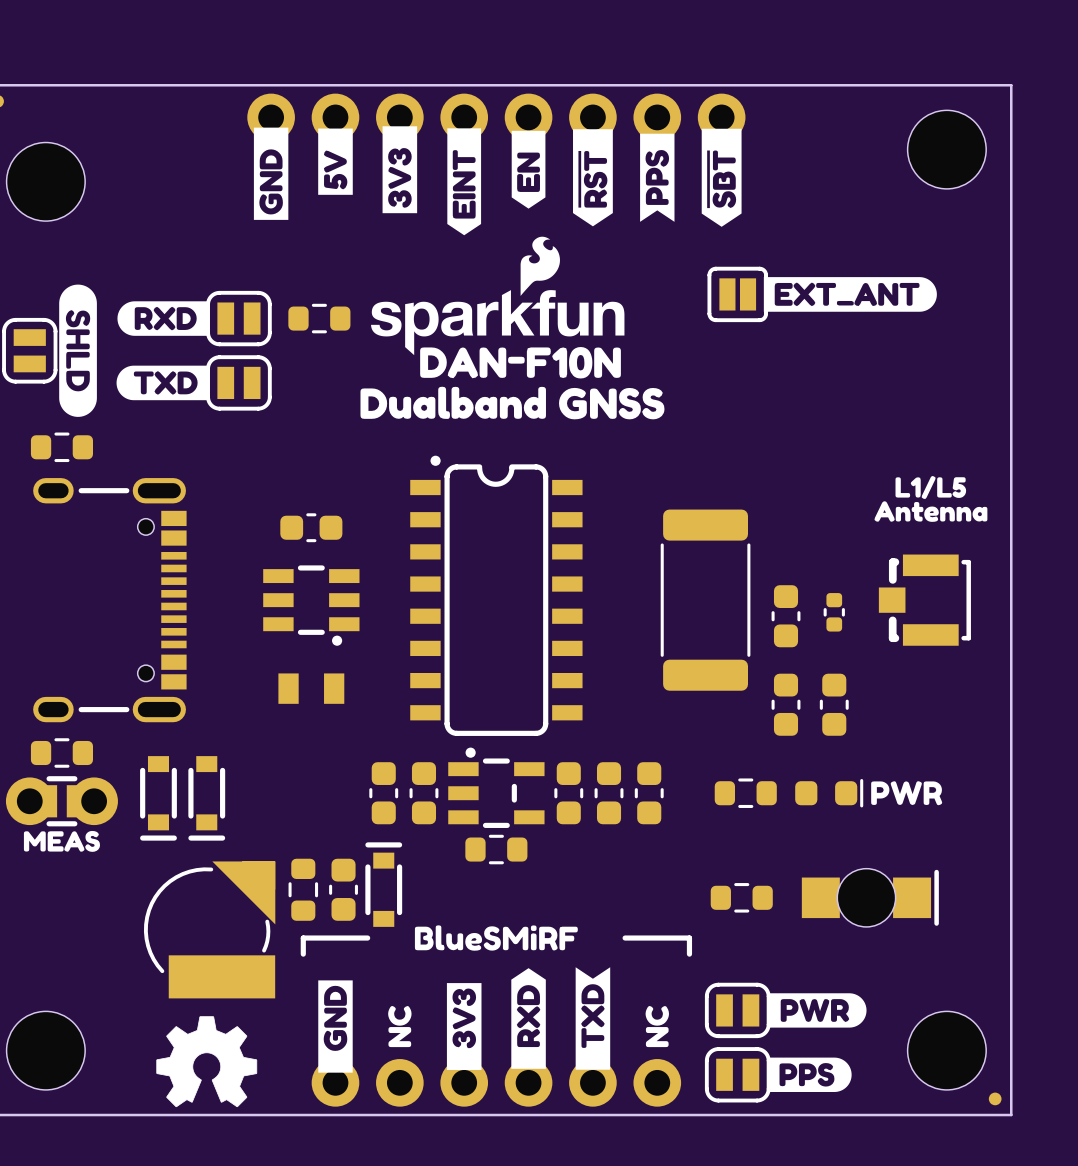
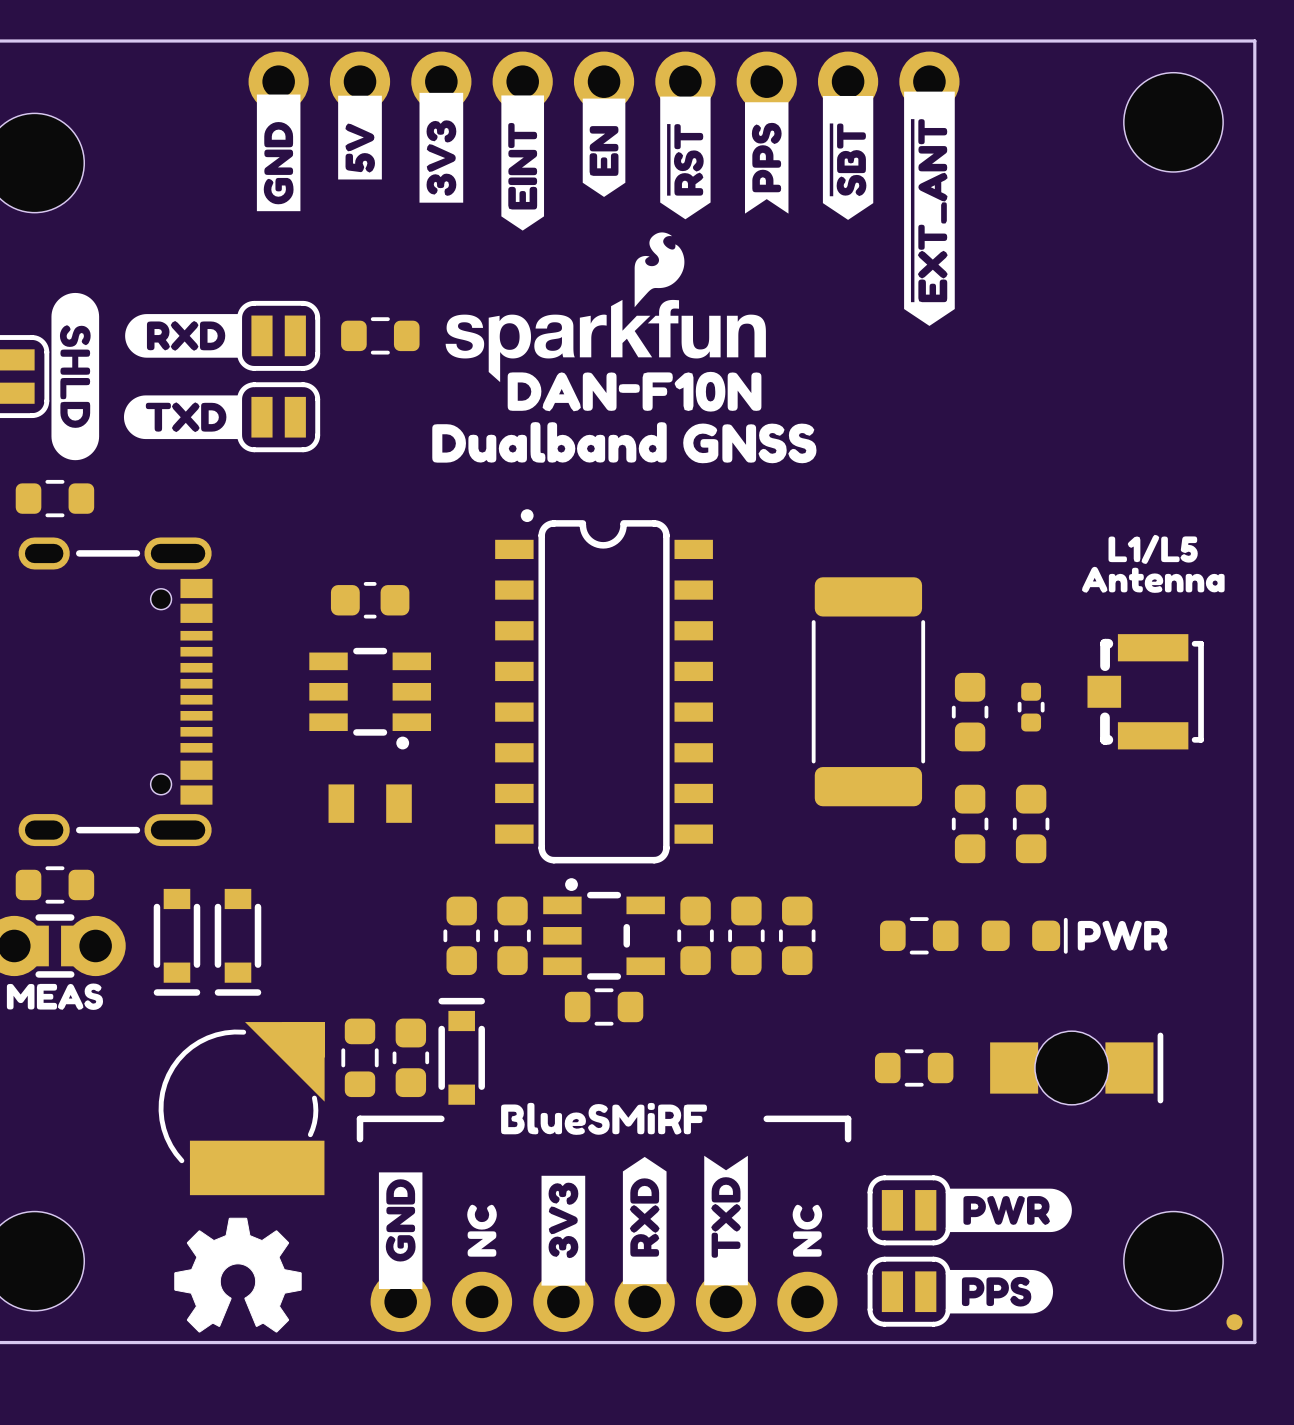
part footprint: [247, 93, 746, 142] -> [248, 51, 960, 112]
drawing: none -> [904, 91, 955, 326]
drawing position: (335, 161) -> (360, 137)
drawing position: (399, 169) -> (441, 147)
drawing position: (528, 169) -> (604, 147)
drawing position: (271, 173) -> (278, 152)
drawing position: (592, 177) -> (685, 157)
drawing position: (657, 177) -> (766, 157)
drawing position: (721, 177) -> (848, 157)
drawing position: (464, 181) -> (522, 163)
drawing: [763, 277, 937, 312] -> none
part: (737, 294) -> none

